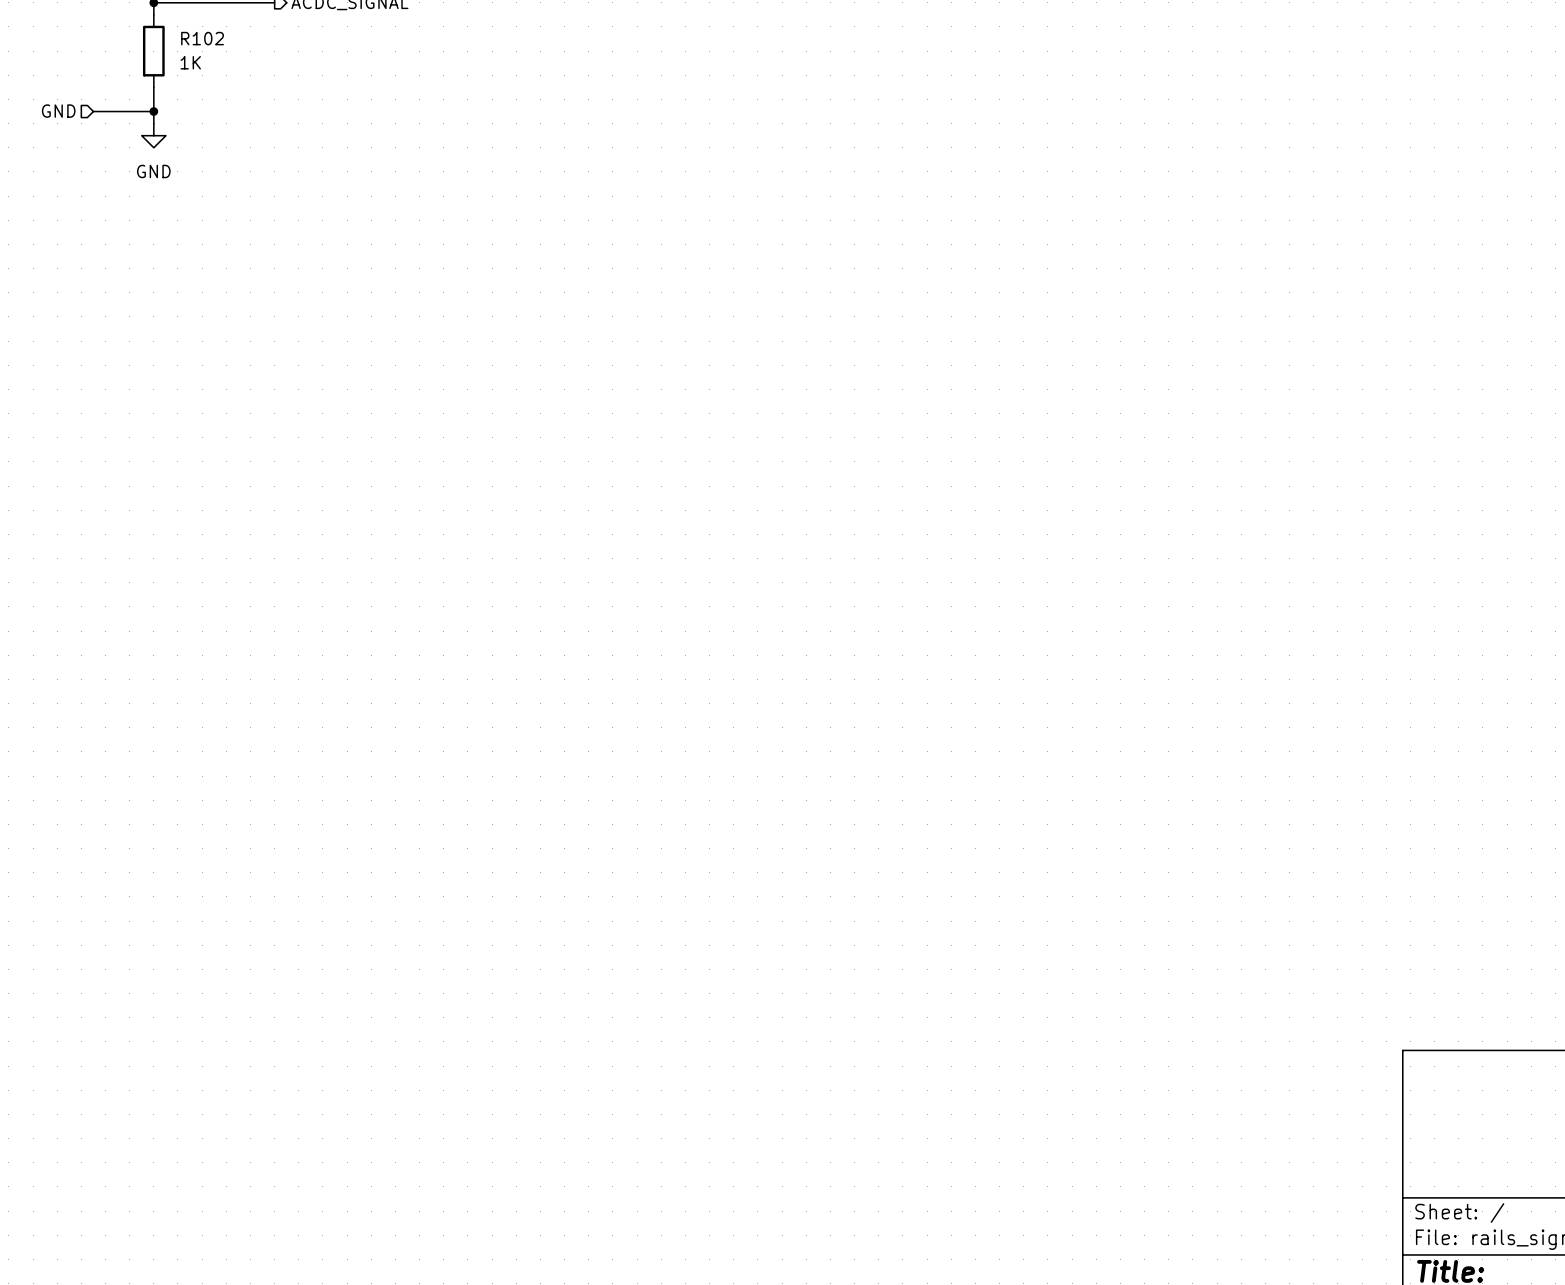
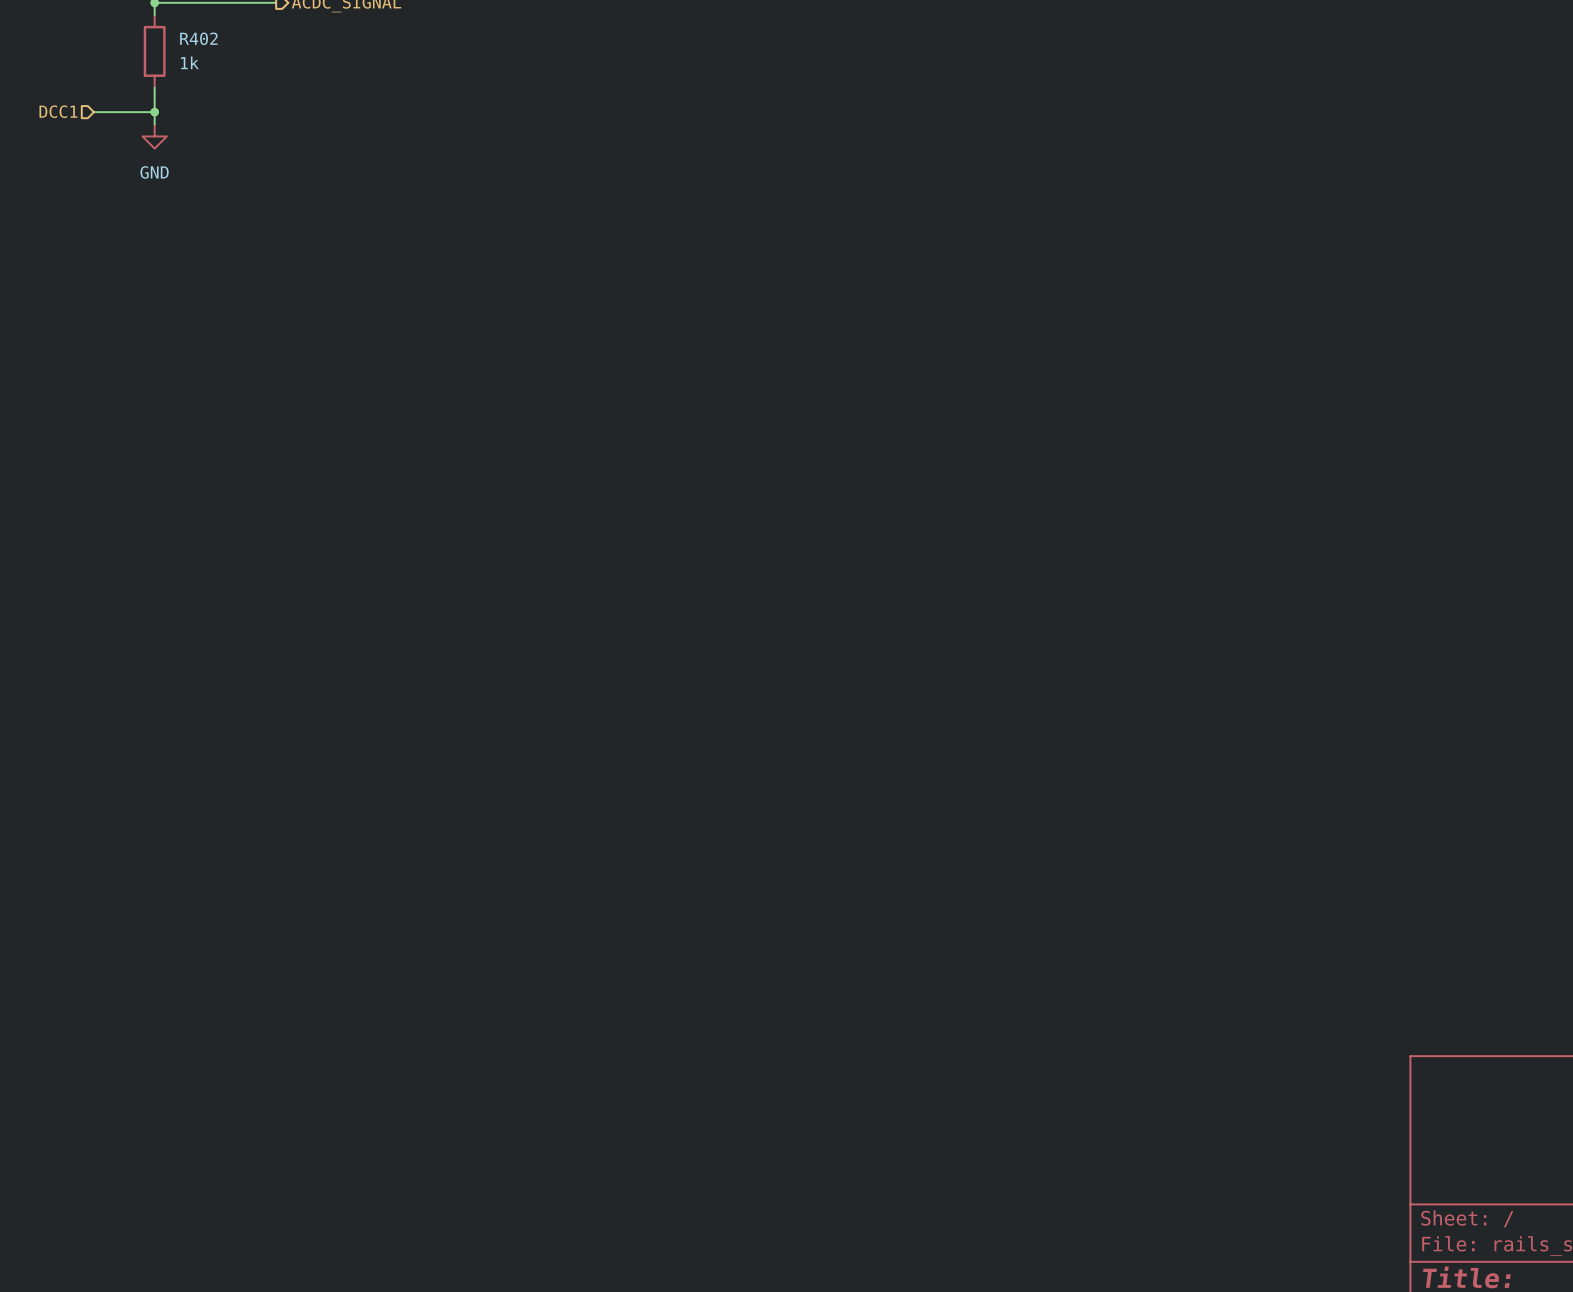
R102 name: R102 (202, 38) -> R402 (198, 38)
R102 value: 1K (190, 62) -> 1k (189, 62)
hierarchical label: GND (58, 111) -> DCC1 (58, 111)

